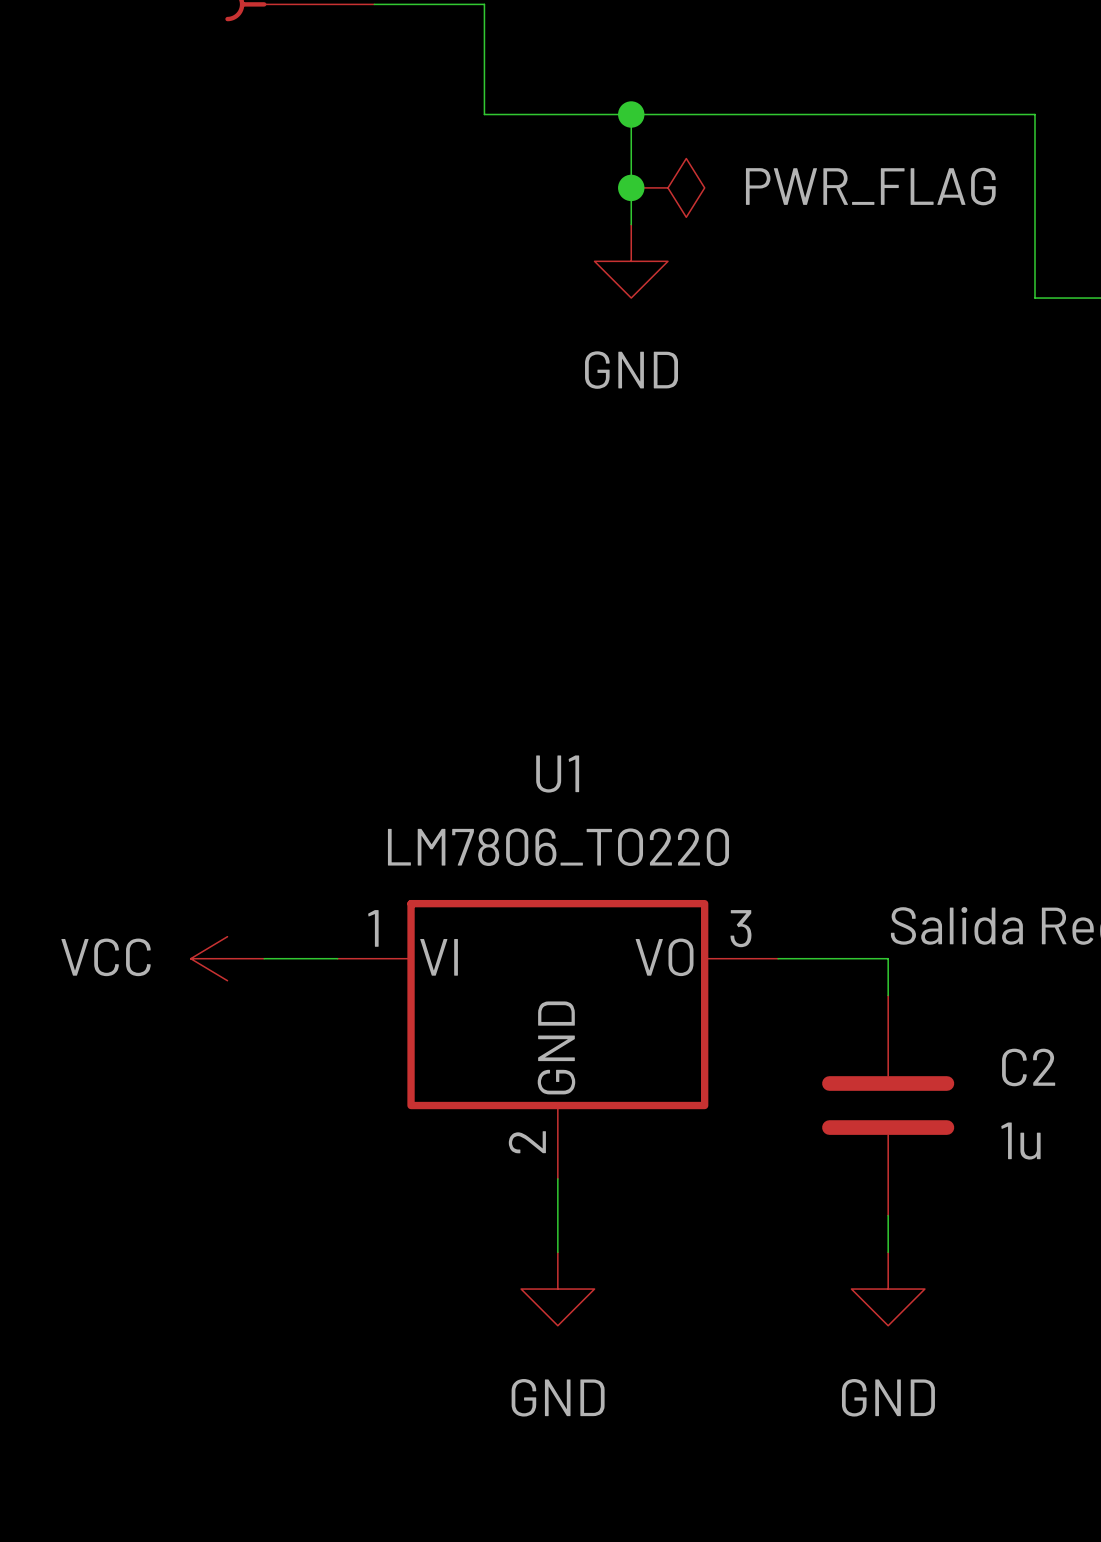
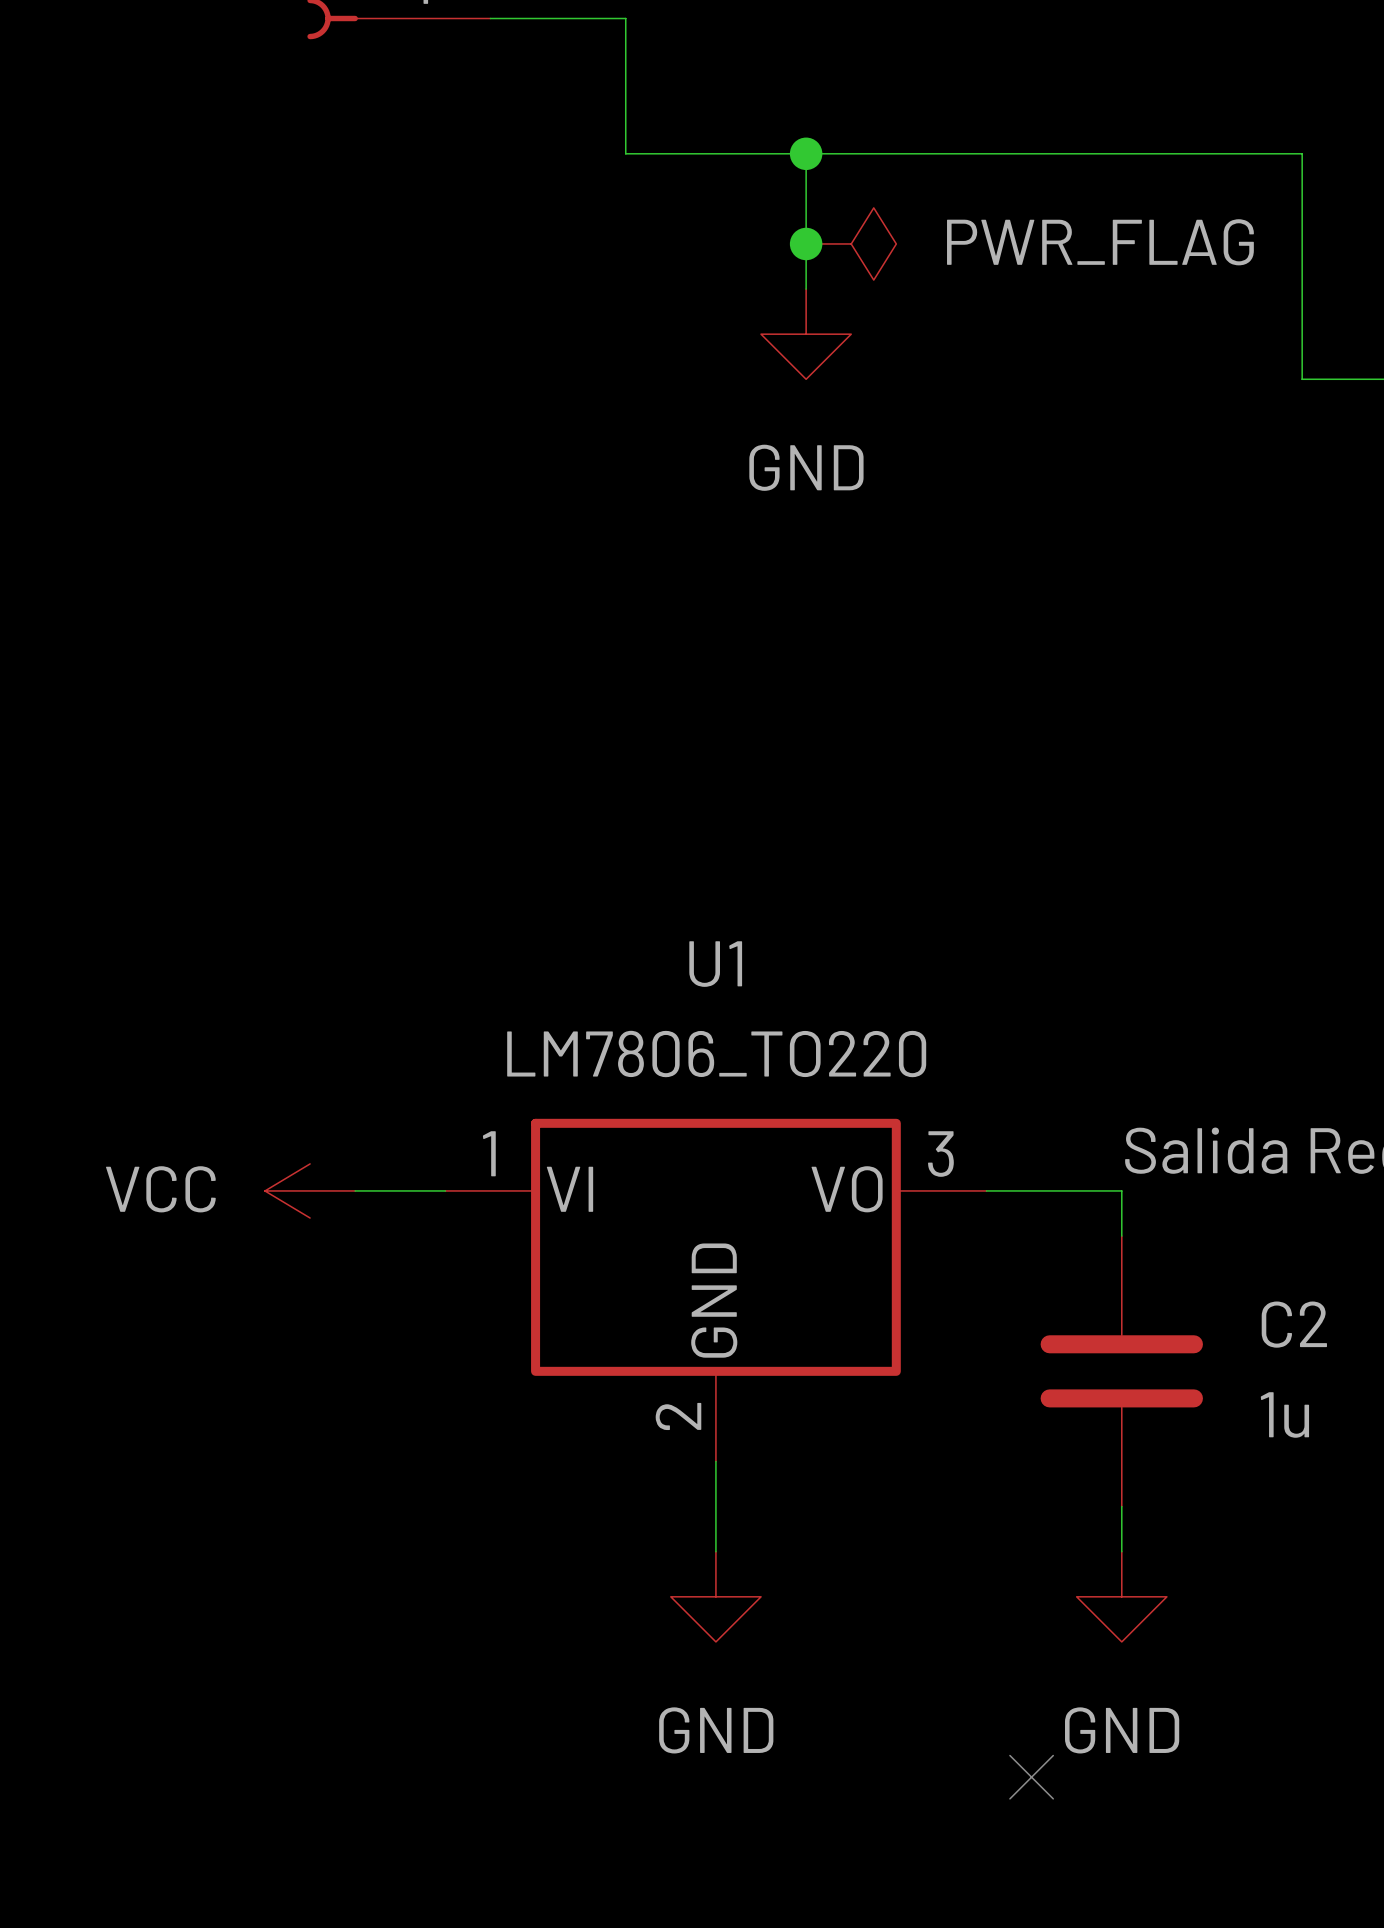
no-connect mark: none -> (1031, 1777)

